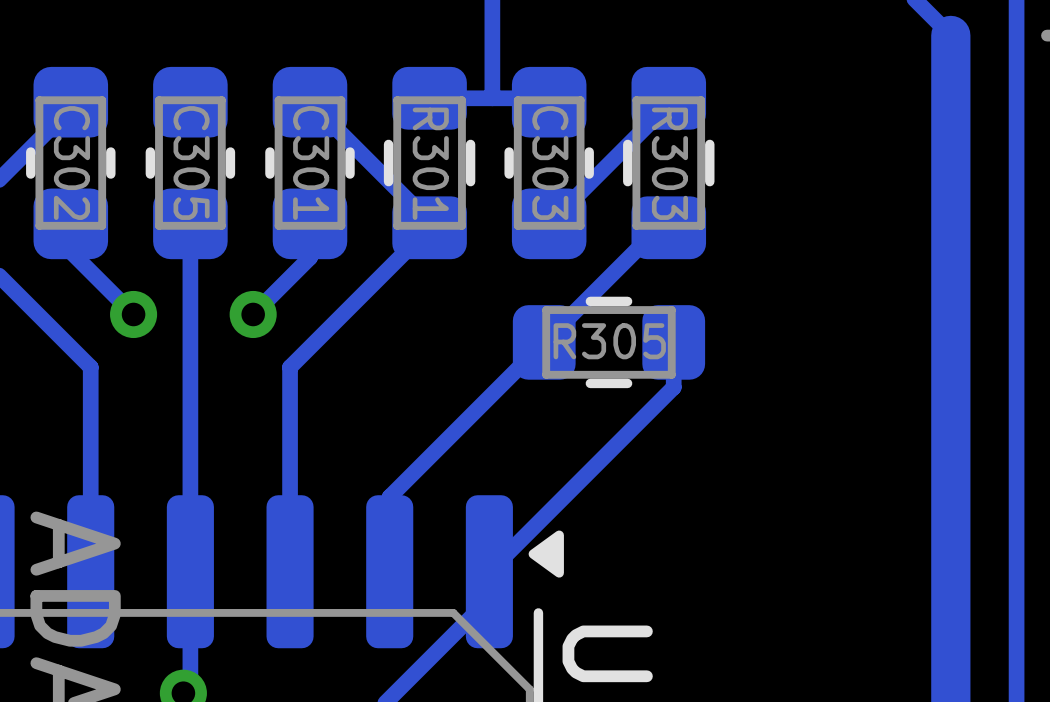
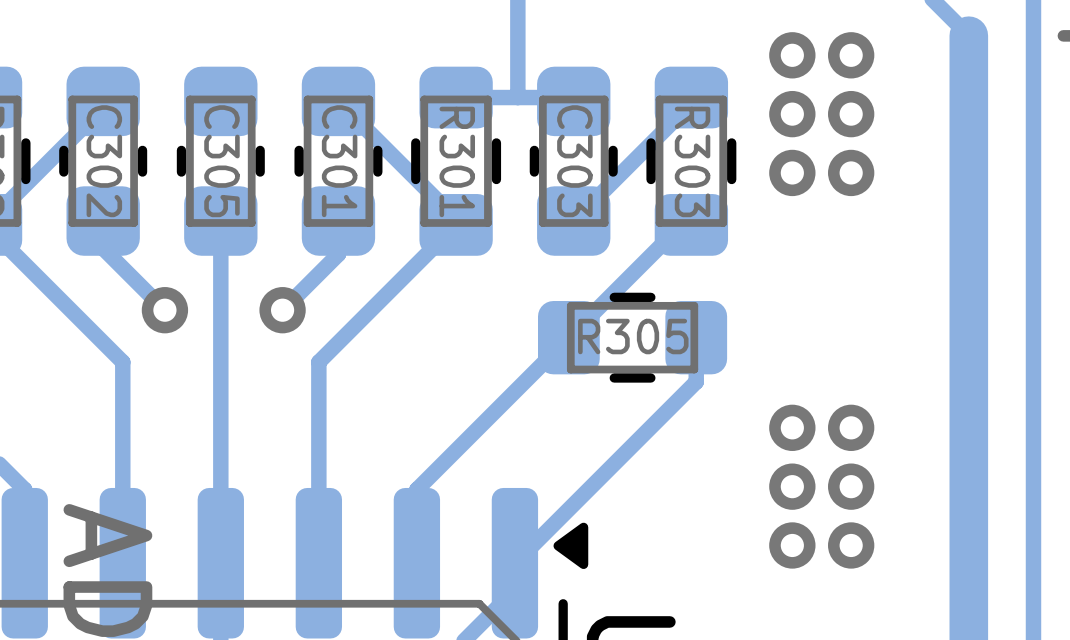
via: none -> (792, 55)
via: none -> (851, 55)
via: none -> (792, 114)
via: none -> (851, 114)
via: none -> (792, 172)
via: none -> (851, 172)
via: none -> (792, 427)
via: none -> (851, 427)
via: none -> (792, 486)
via: none -> (851, 486)
via: none -> (792, 545)
via: none -> (851, 545)

